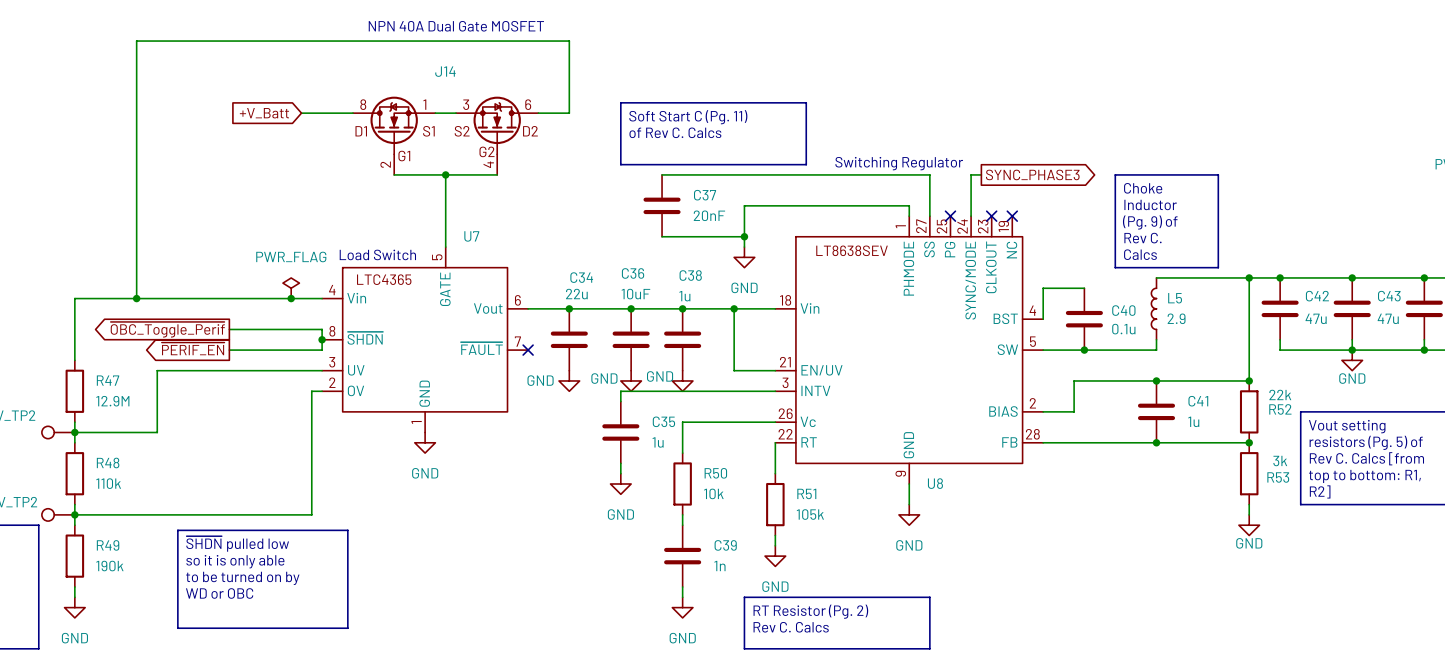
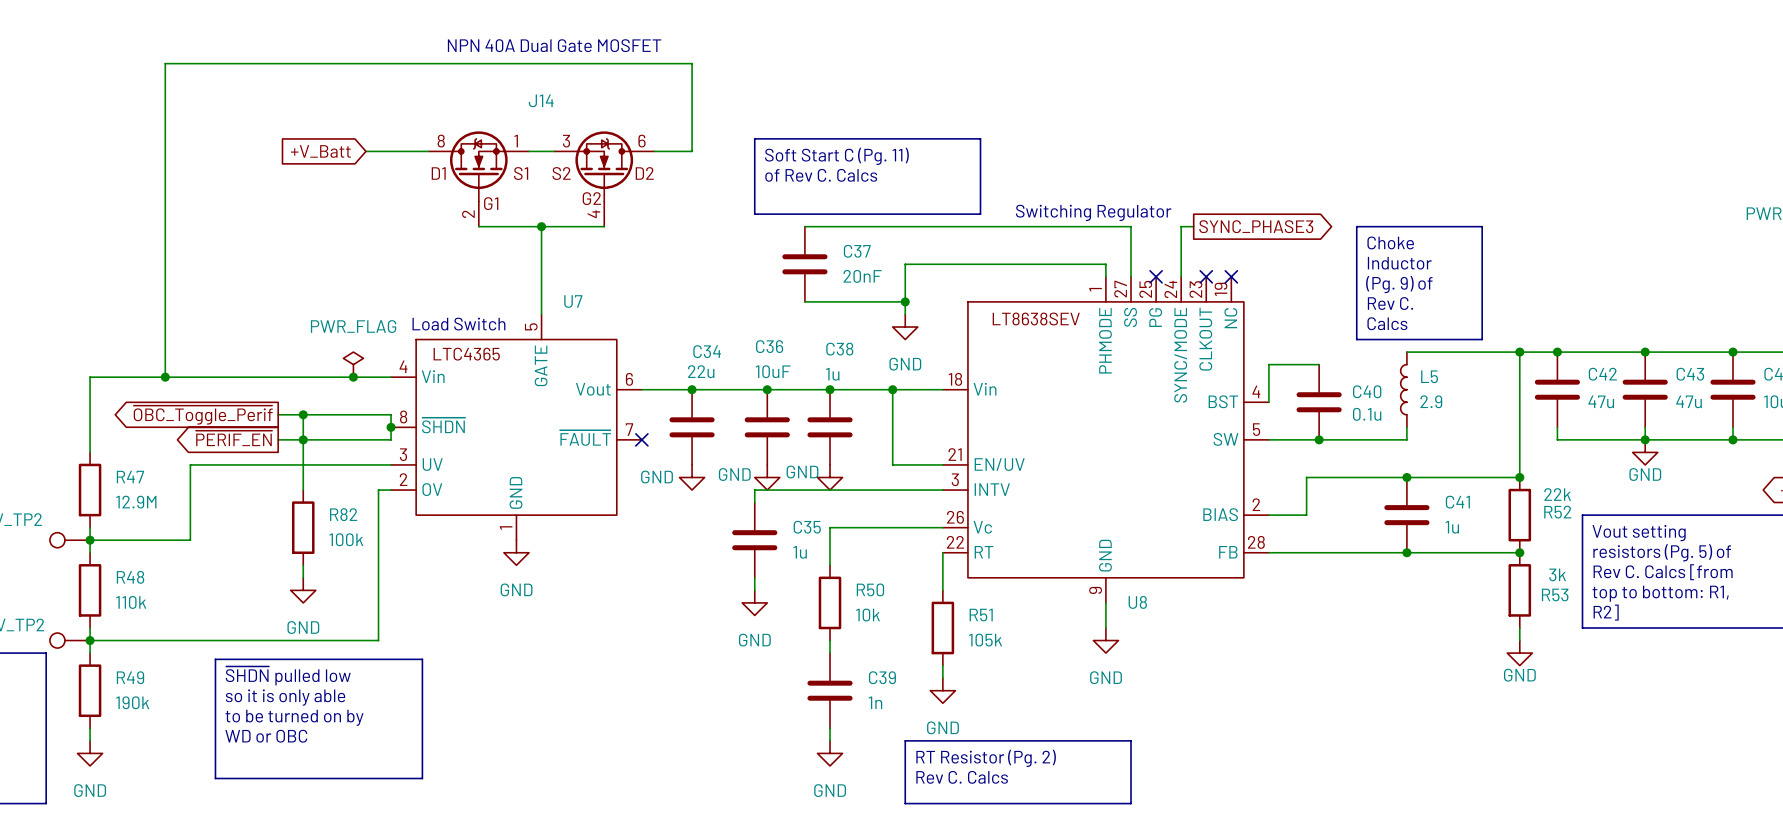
wire: none -> (303, 414) (303, 490)
junction: none -> (303, 414)
junction: none -> (303, 439)
R82: none -> 100k (303, 527)
wire: none -> (303, 565) (303, 577)
power symbol: none -> GND (303, 590)

